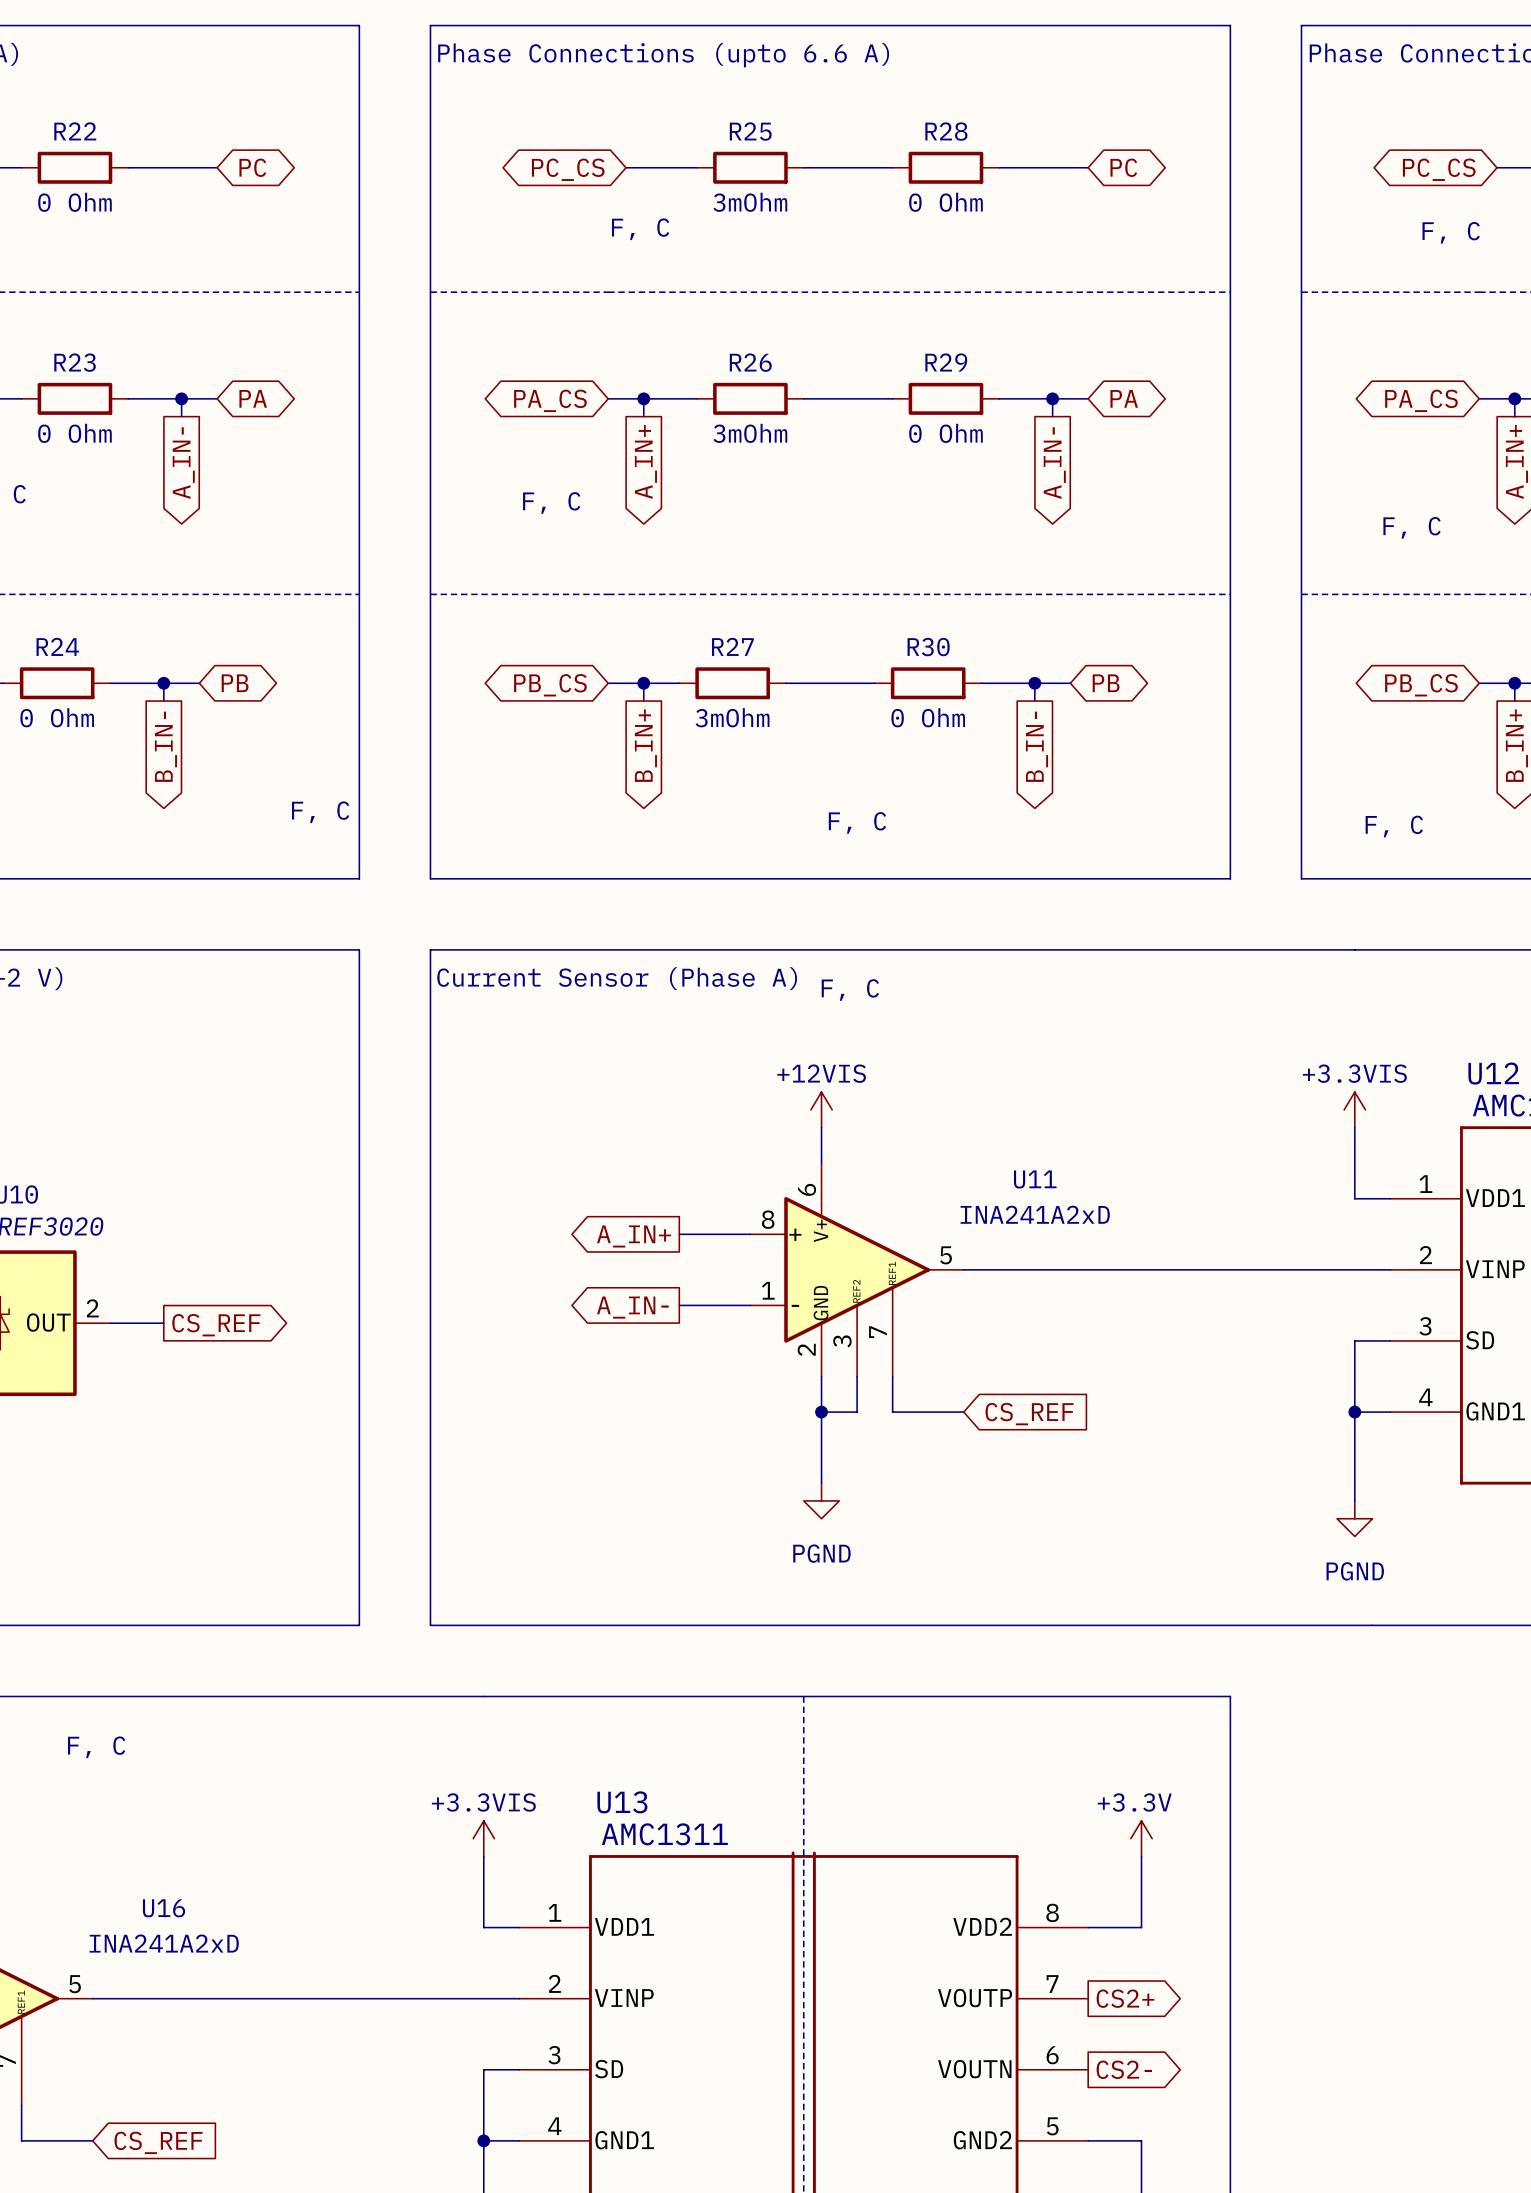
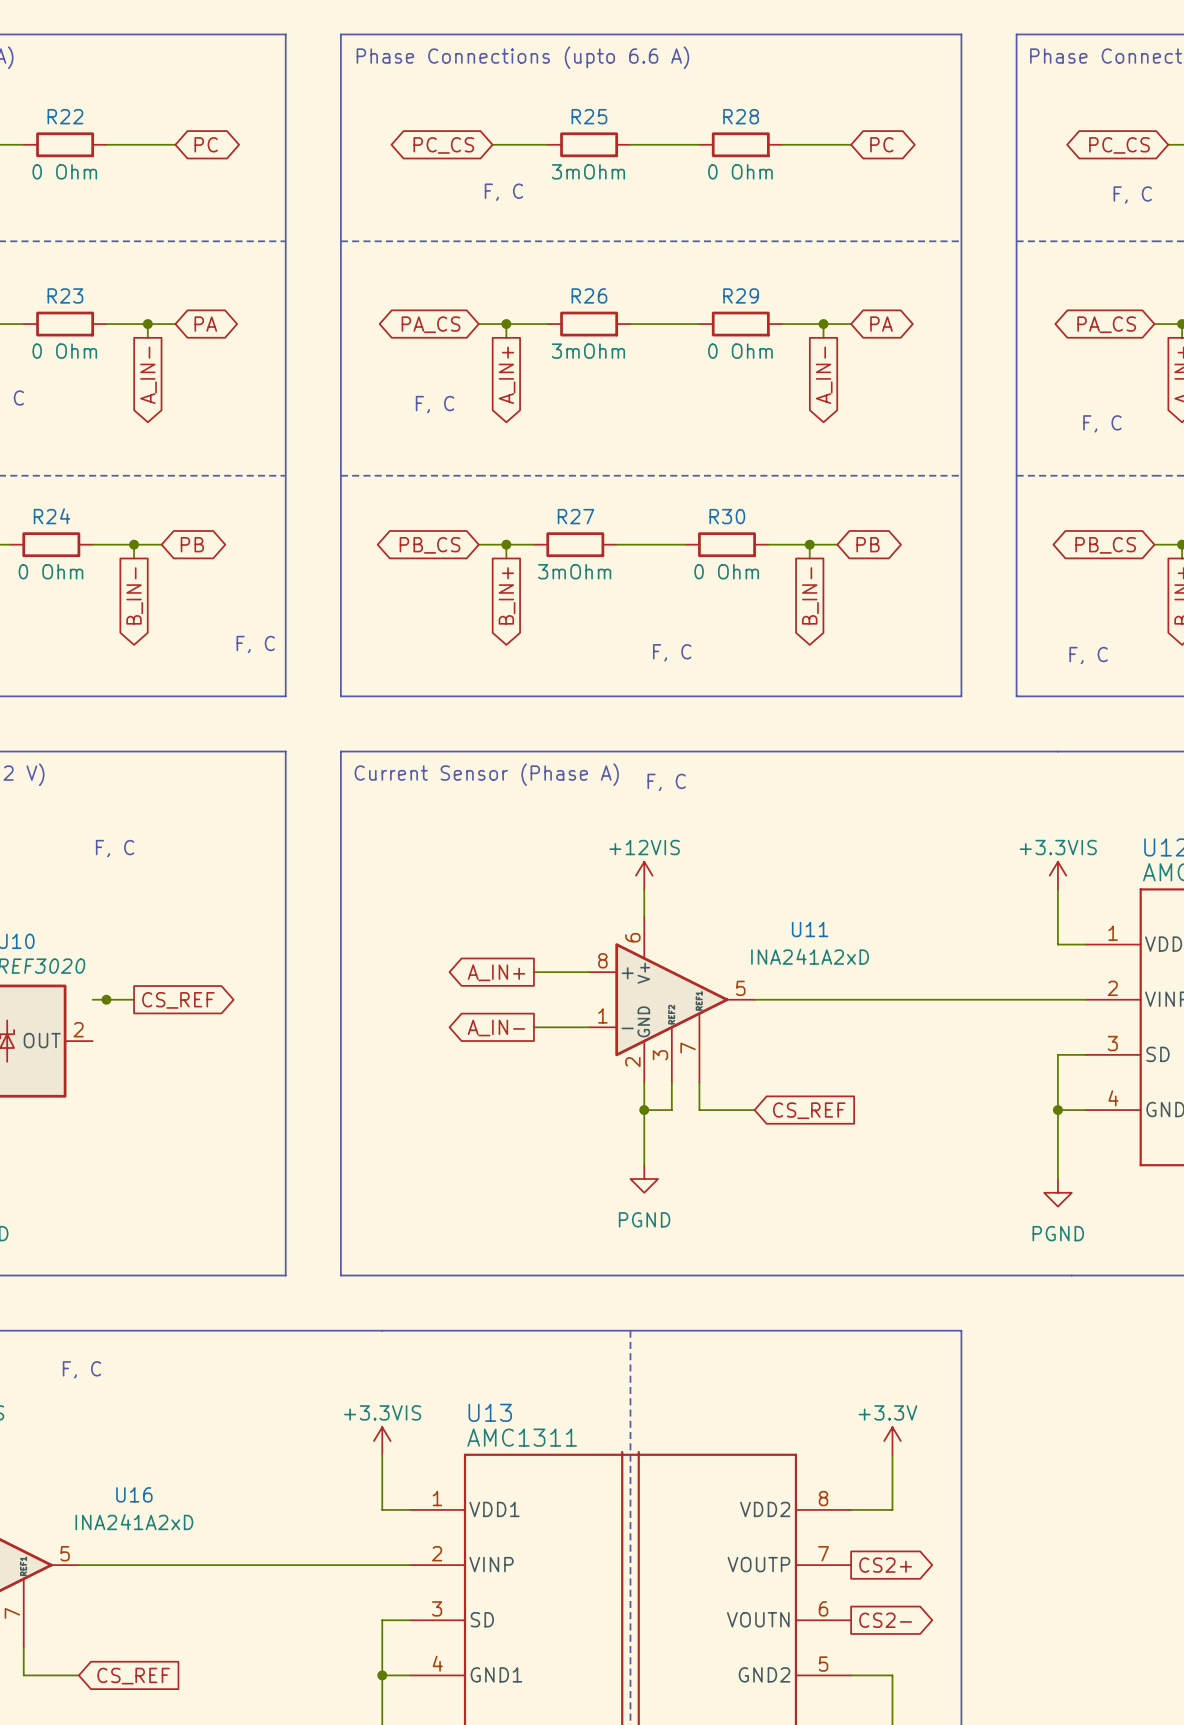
text: none -> F, C (115, 848)
junction: none -> (106, 999)
wire: (110, 1323) (163, 1323) -> (92, 999) (134, 999)
global label position: CS_REF (216, 1325) -> CS_REF (178, 1000)

